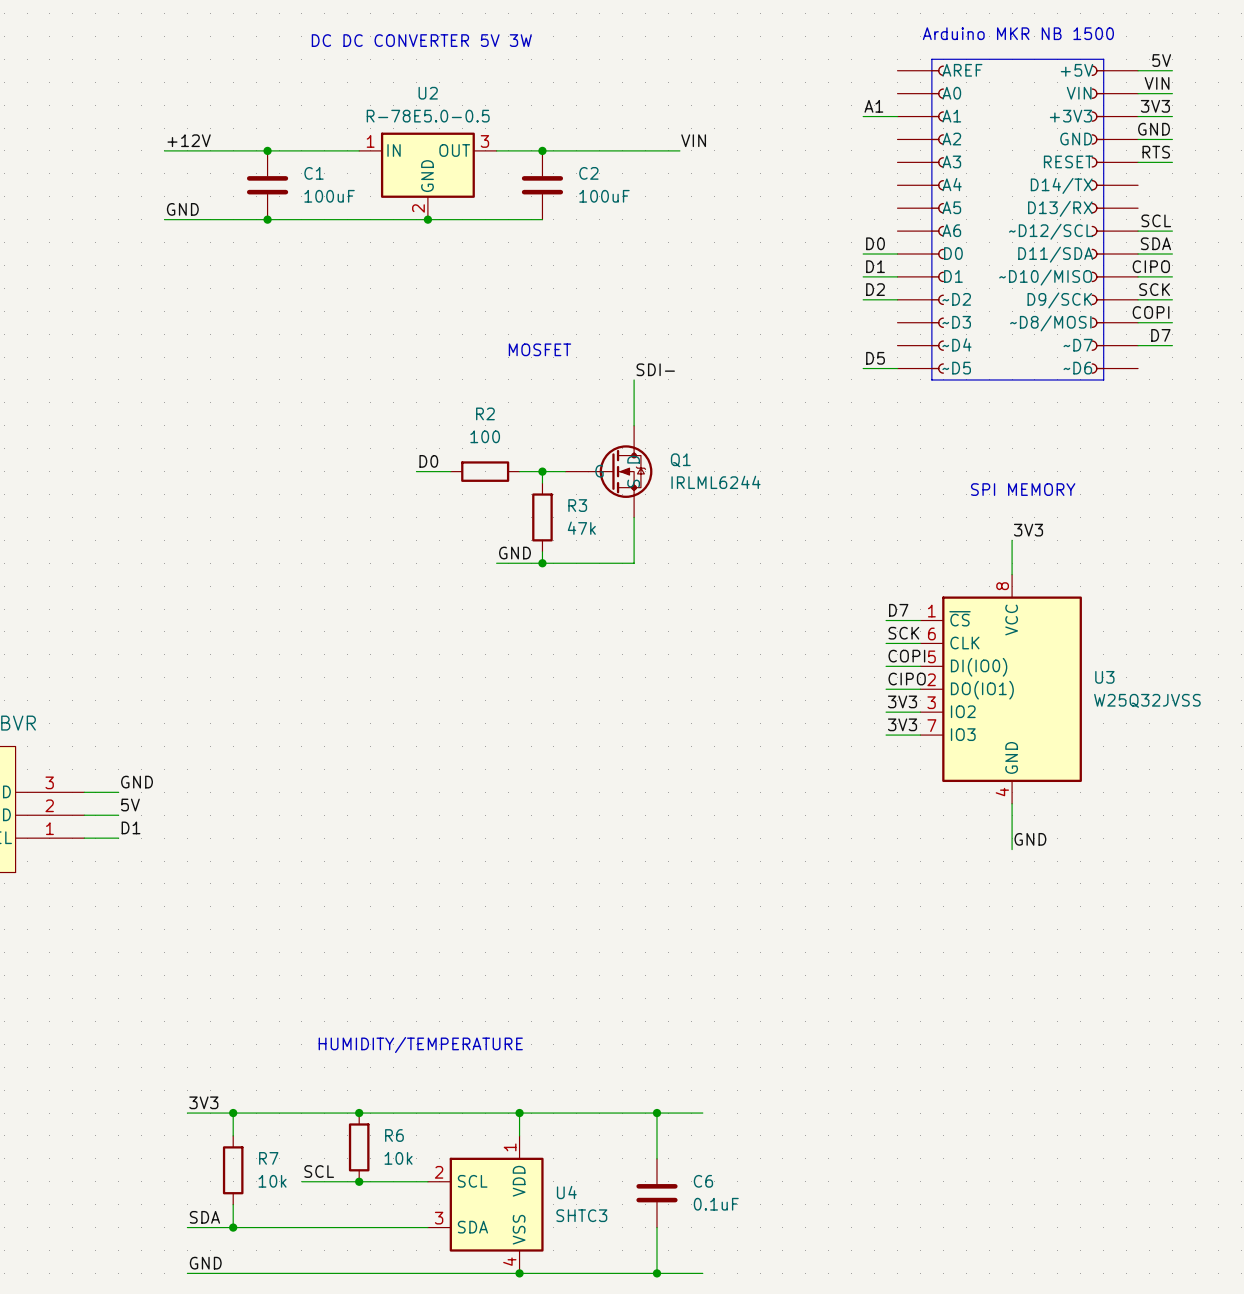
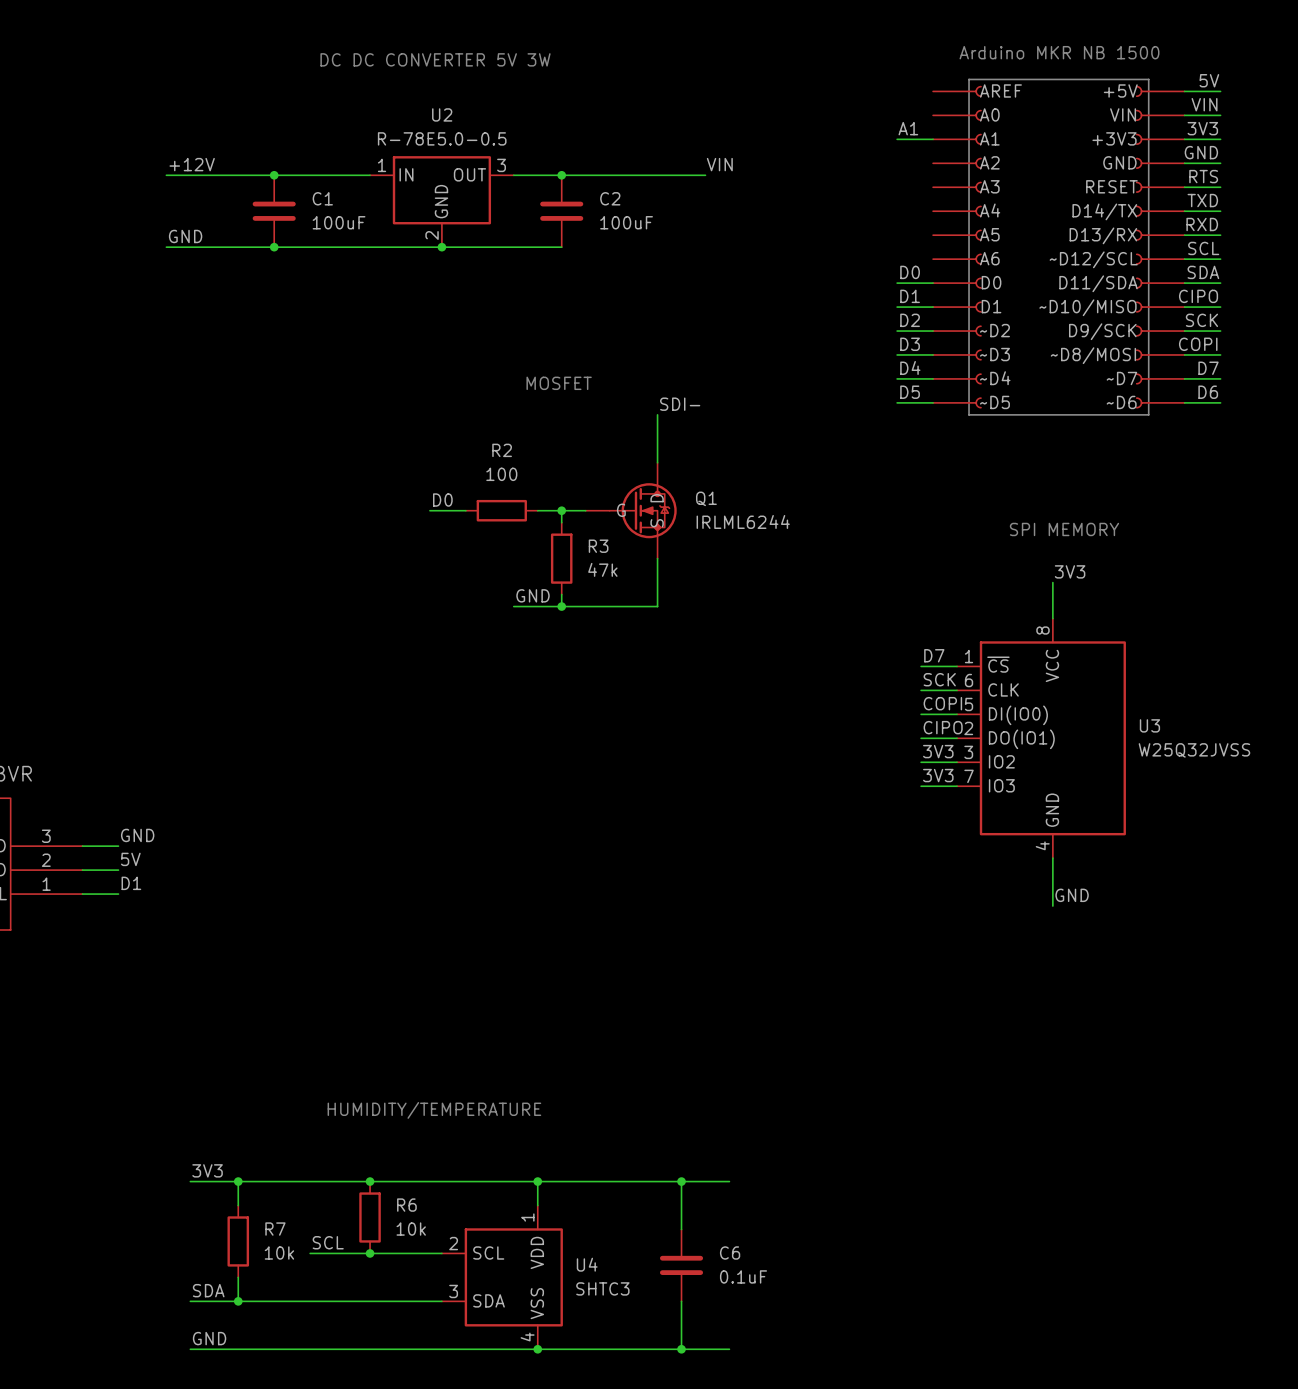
label: none -> TXD (1202, 200)
wire: none -> (1184, 211) (1220, 211)
label: none -> RXD (1202, 224)
wire: none -> (1184, 235) (1220, 235)
label: none -> D3 (910, 344)
wire: none -> (897, 354) (933, 354)
label: none -> D4 (910, 367)
wire: none -> (897, 378) (933, 378)
label: none -> D6 (1208, 392)
wire: none -> (1184, 402) (1220, 402)

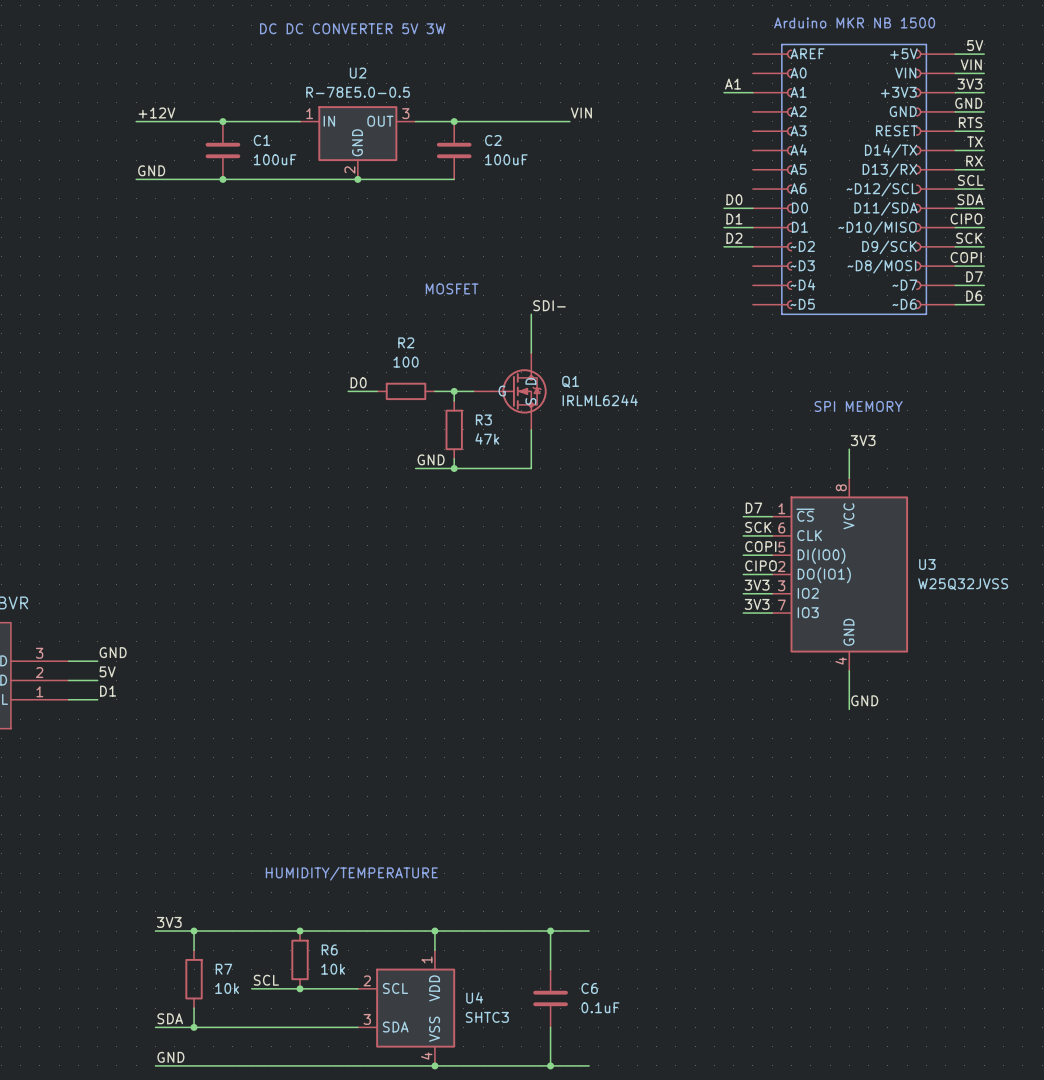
label: TXD (1202, 200) -> TX (974, 141)
label: RXD (1202, 224) -> RX (974, 161)
label: D3 (910, 344) -> none
wire: (897, 354) (933, 354) -> none
label: D4 (910, 367) -> none
wire: (897, 378) (933, 378) -> none
label: D5 (910, 392) -> none
wire: (897, 402) (933, 402) -> none

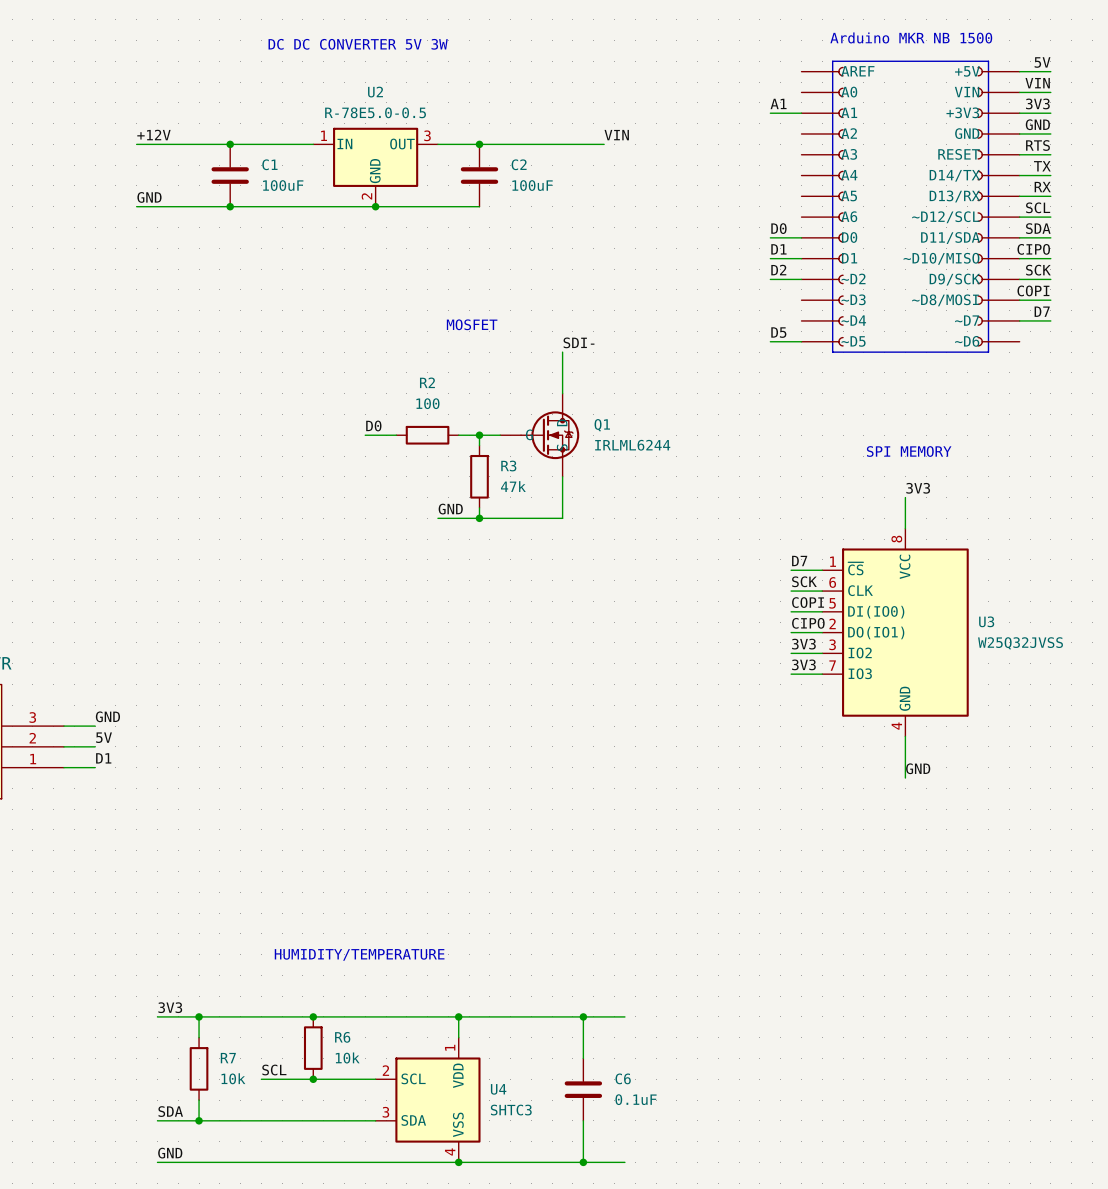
label: none -> D5 (778, 332)
label: D6 (974, 296) -> none
wire: none -> (770, 341) (801, 341)
wire: (955, 304) (984, 304) -> none

